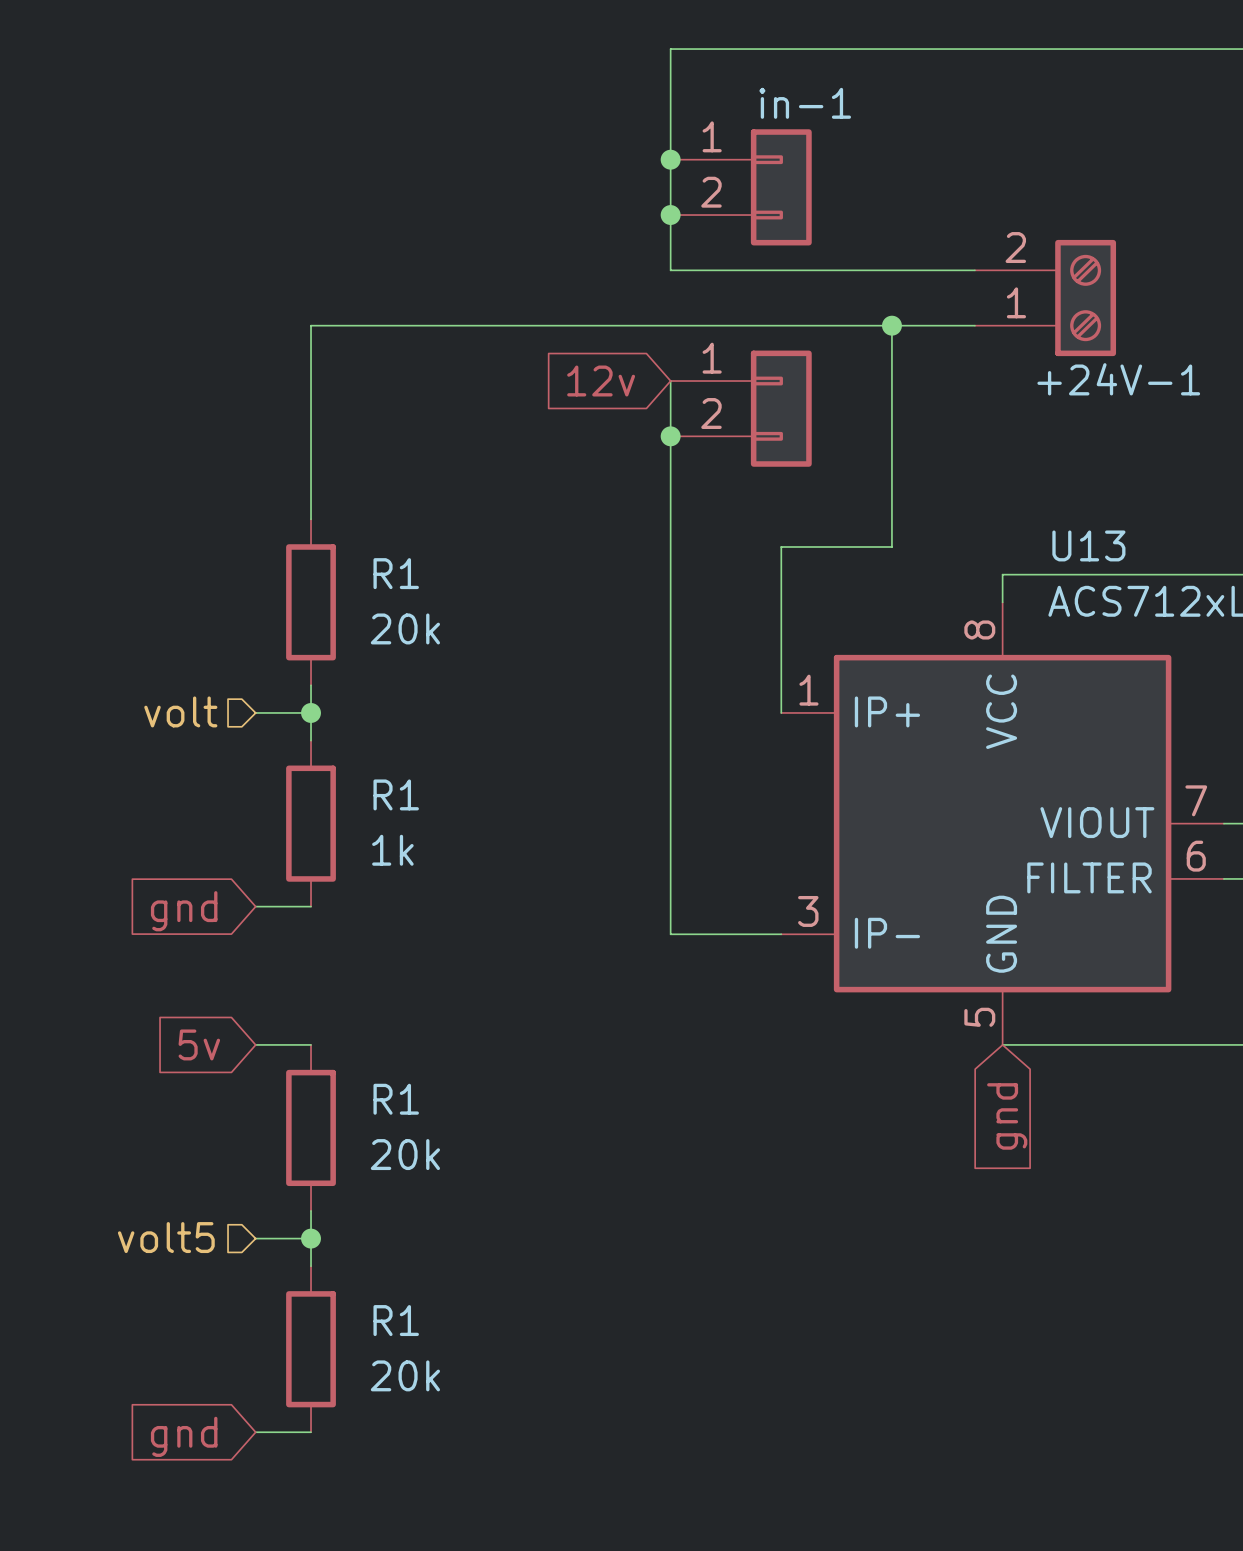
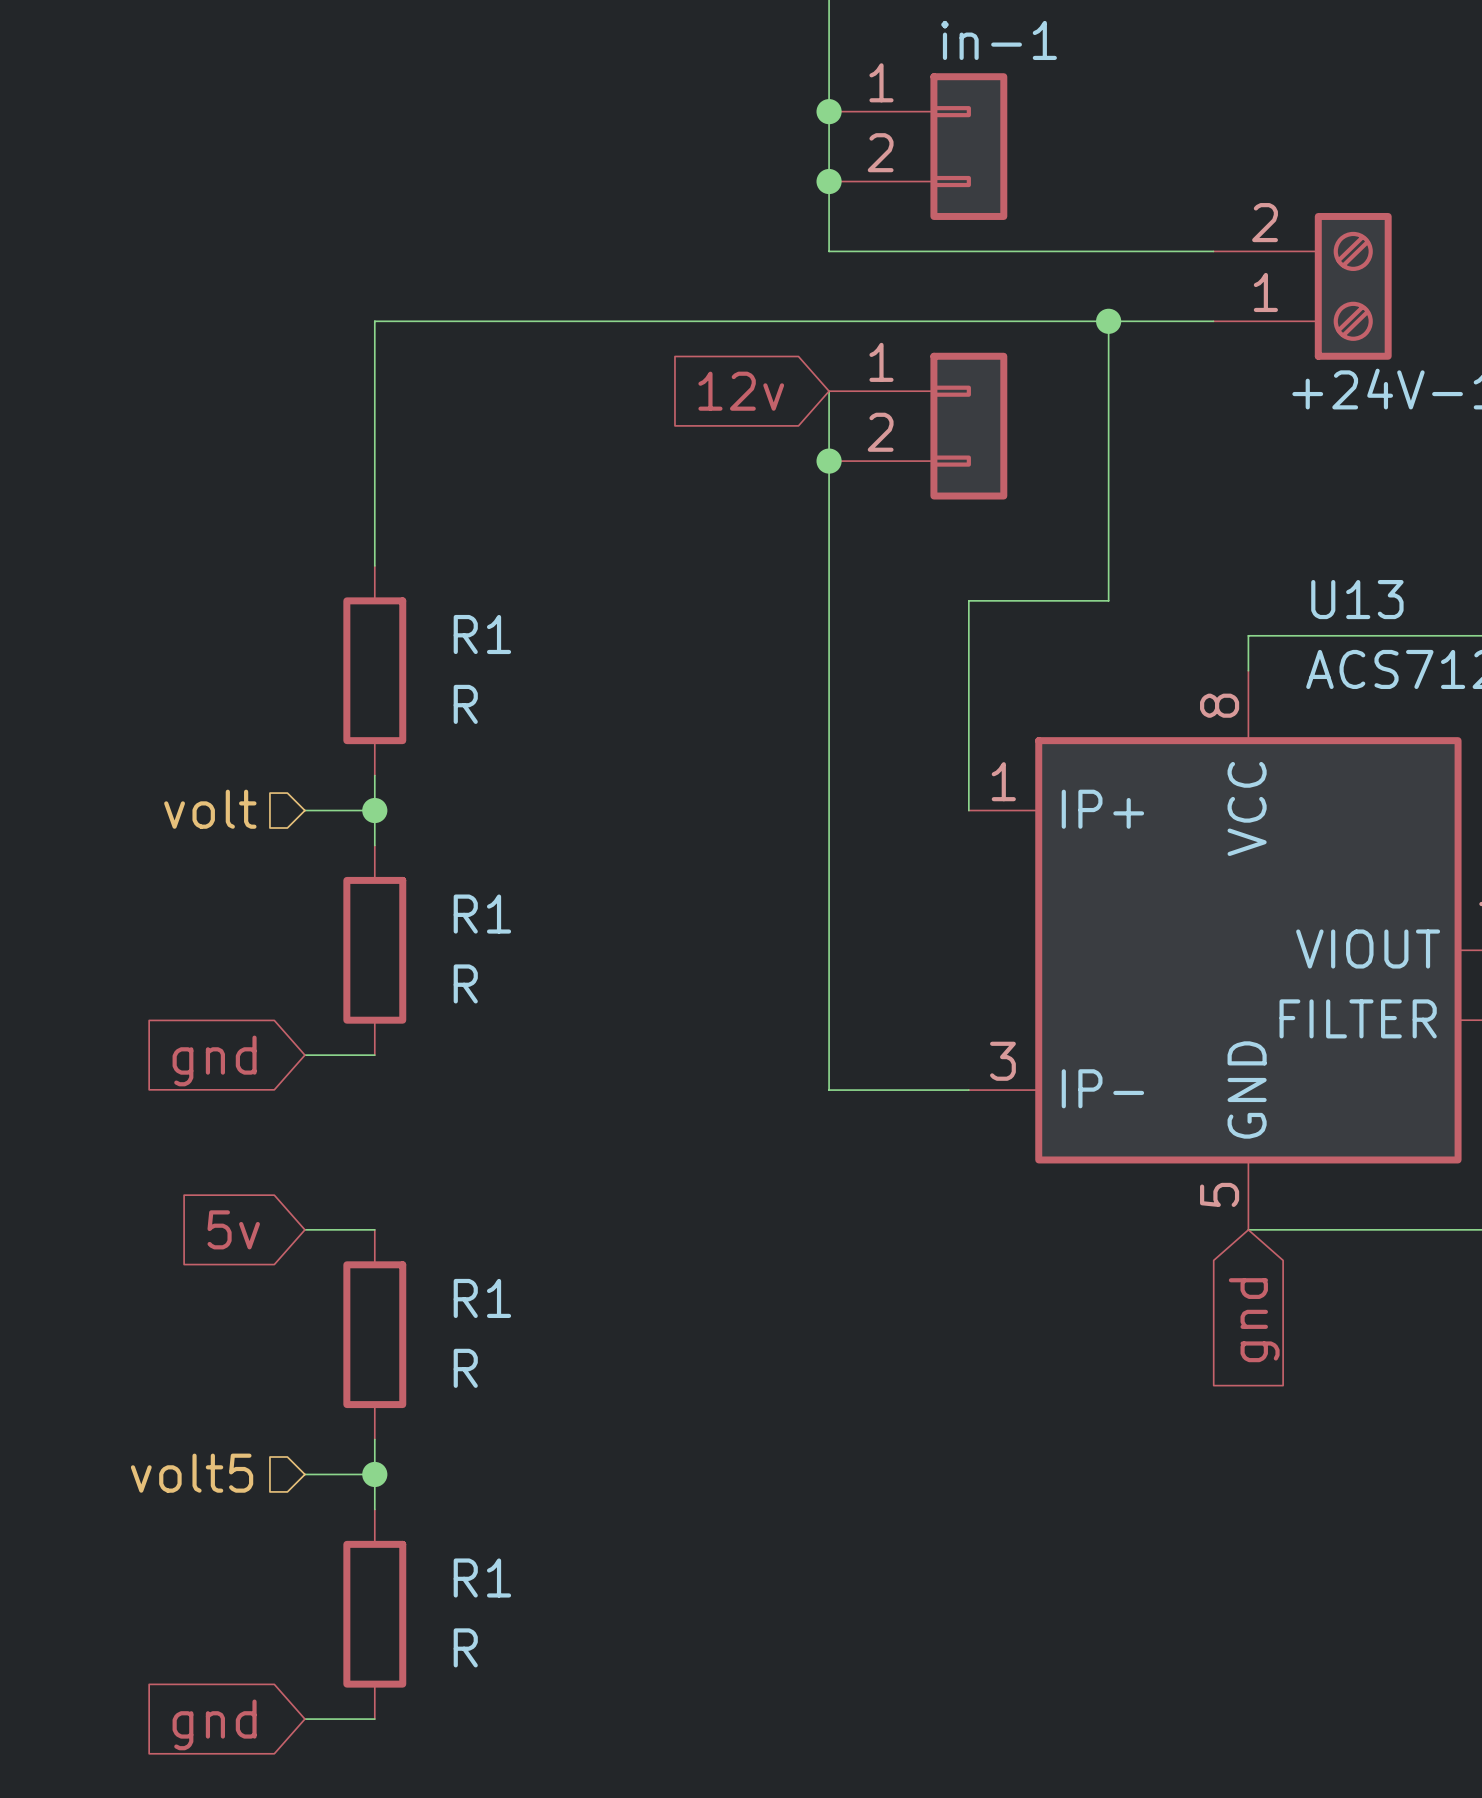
R1 value: 20k (405, 628) -> R (465, 704)
R1 value: 1k (392, 850) -> R (465, 983)
R1 value: 20k (405, 1154) -> R (465, 1368)
R1 value: 20k (405, 1375) -> R (465, 1647)

